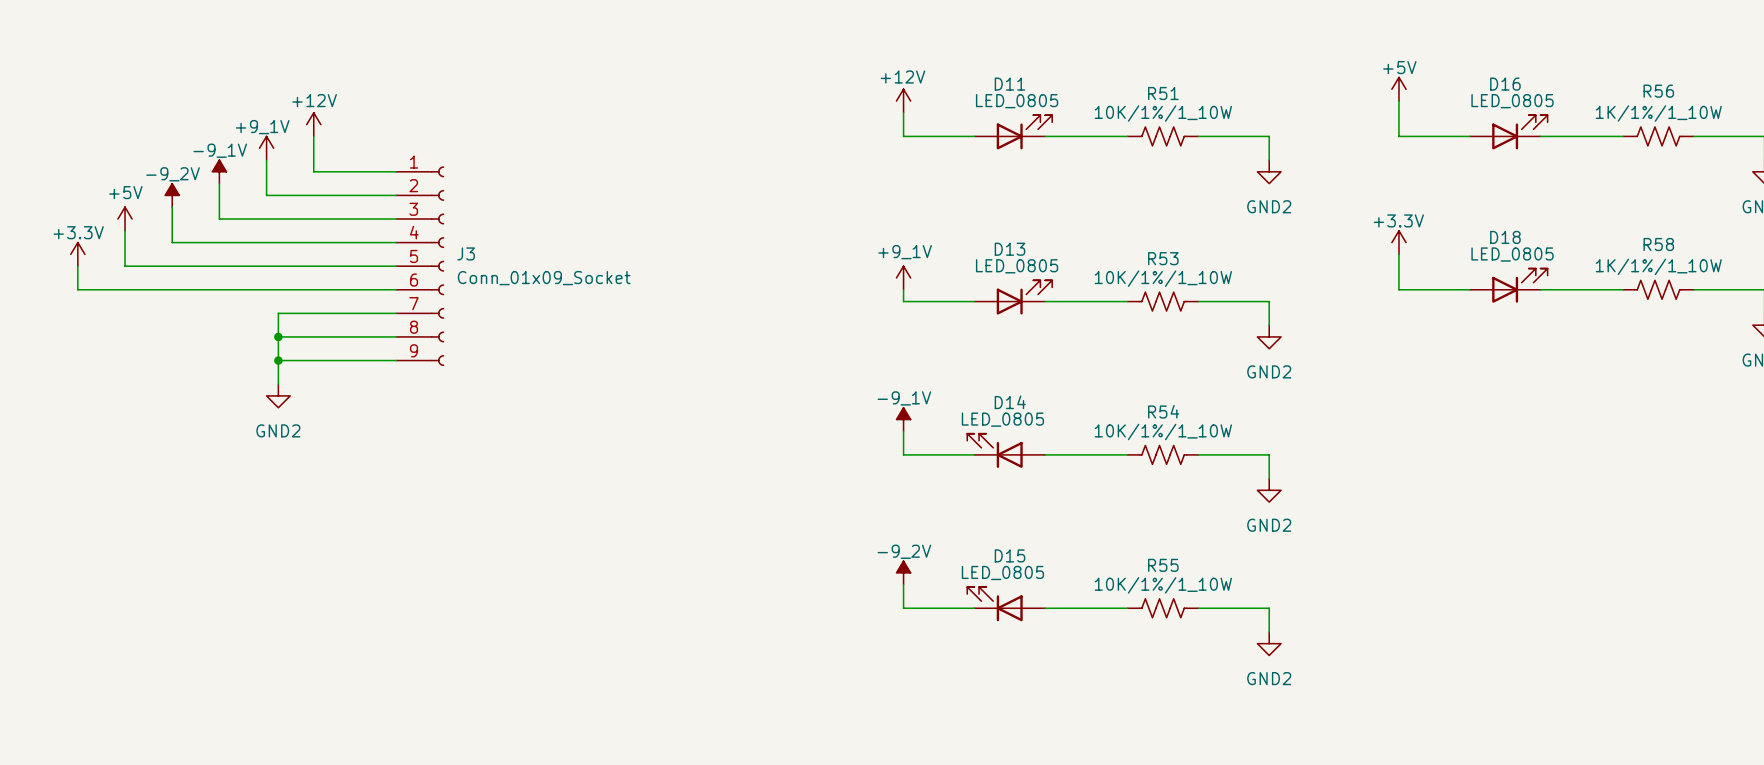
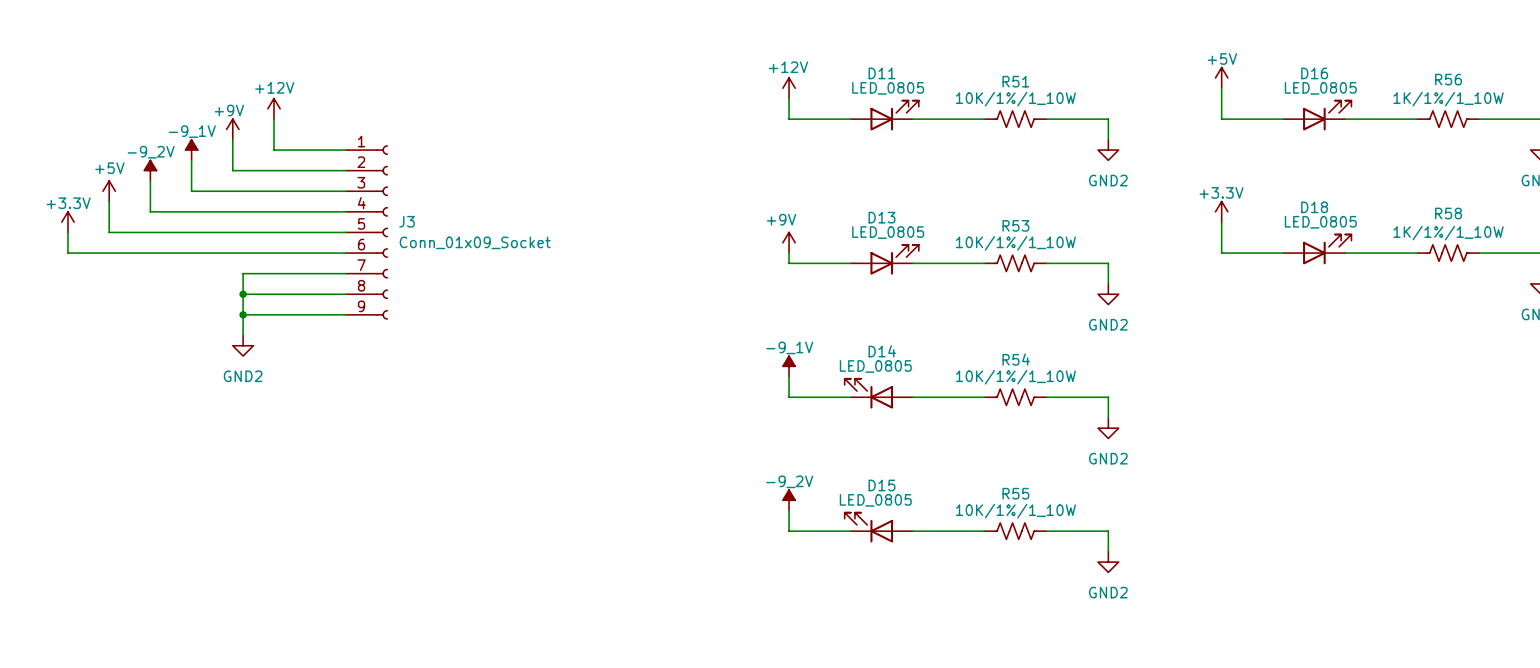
power symbol: +9_1V (266, 148) -> +9V (232, 129)
power symbol: +9_1V (903, 277) -> +9V (789, 242)

